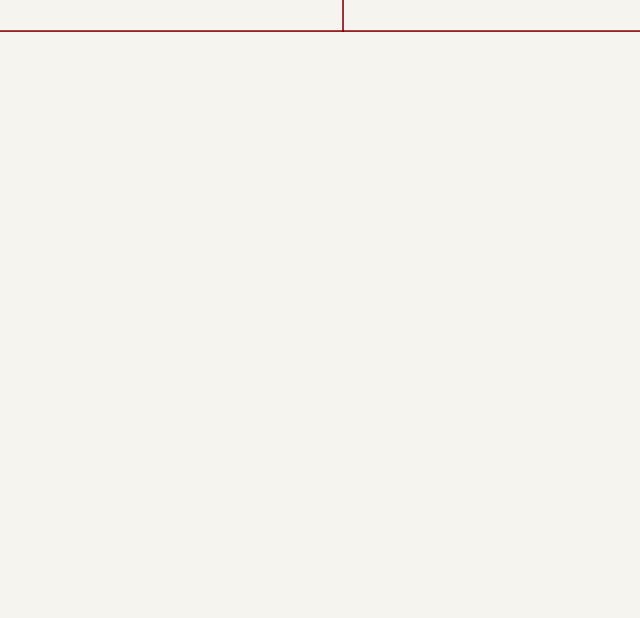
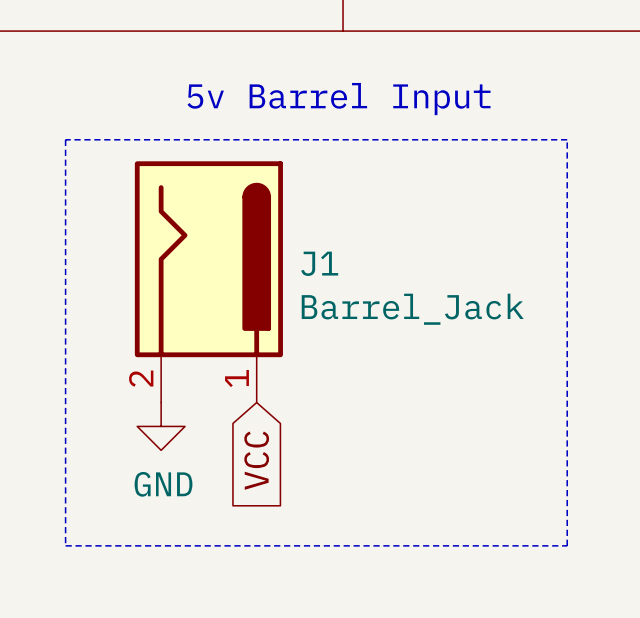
text: none -> 5v Barrel Input (339, 99)
line: none -> (65, 139) (567, 139) (567, 545) (65, 545) (65, 139)
J1: none -> Barrel_Jack (208, 281)
power symbol: none -> GND (161, 426)
global label: none -> VCC (256, 460)

